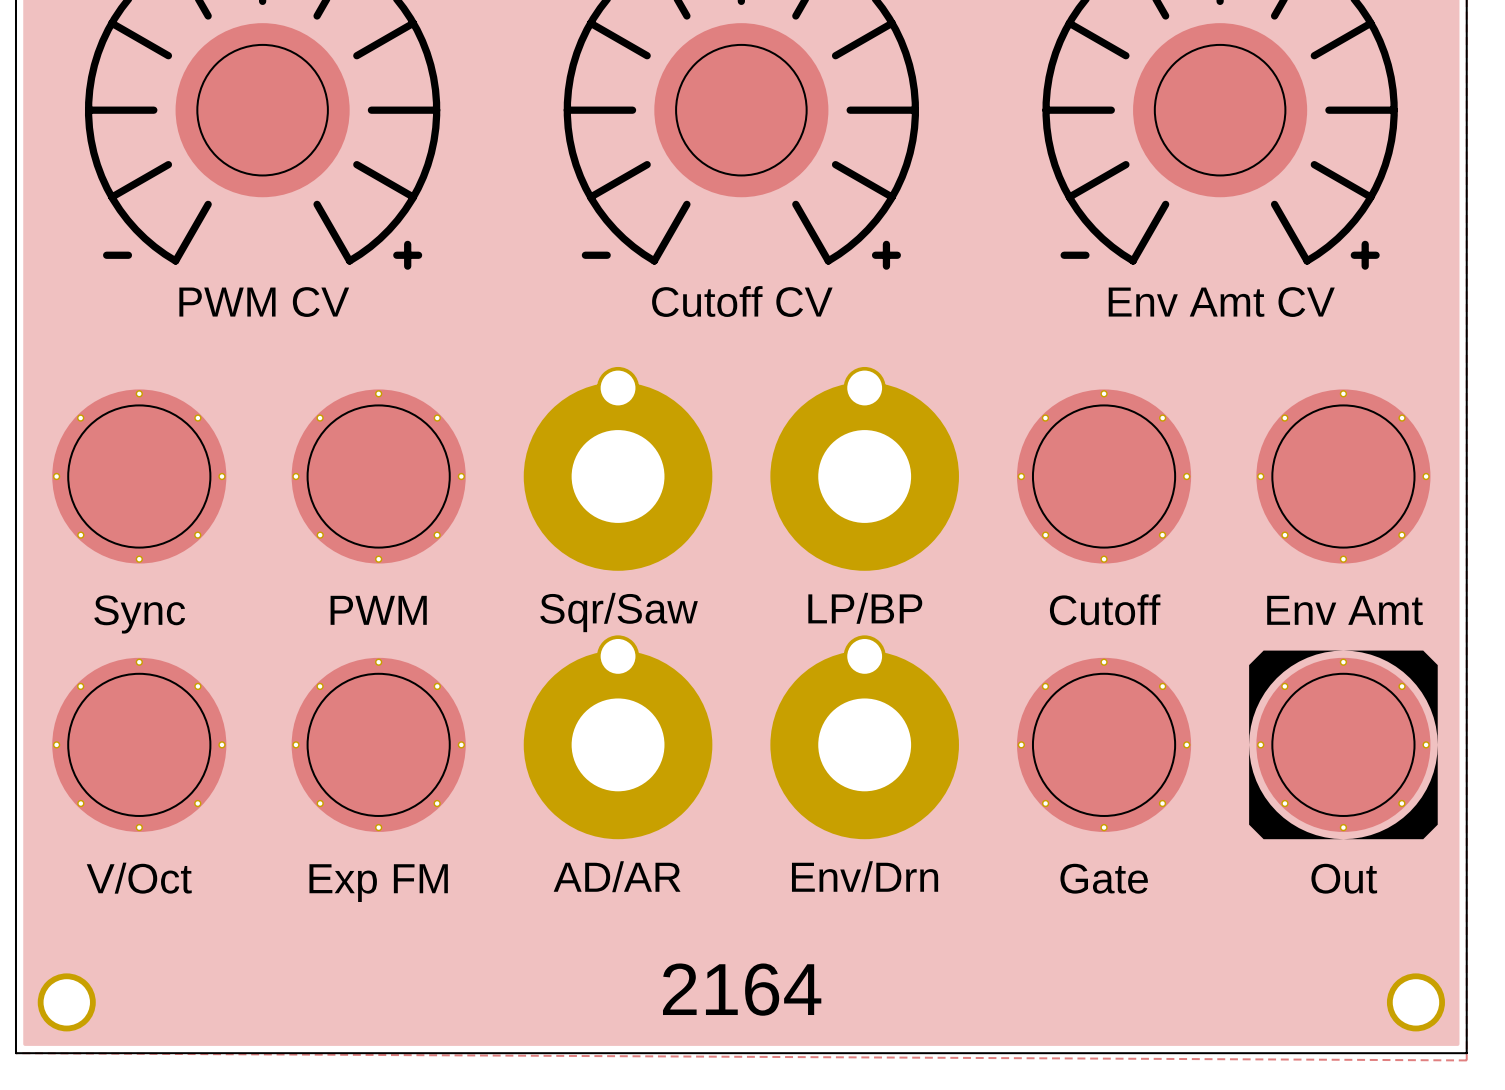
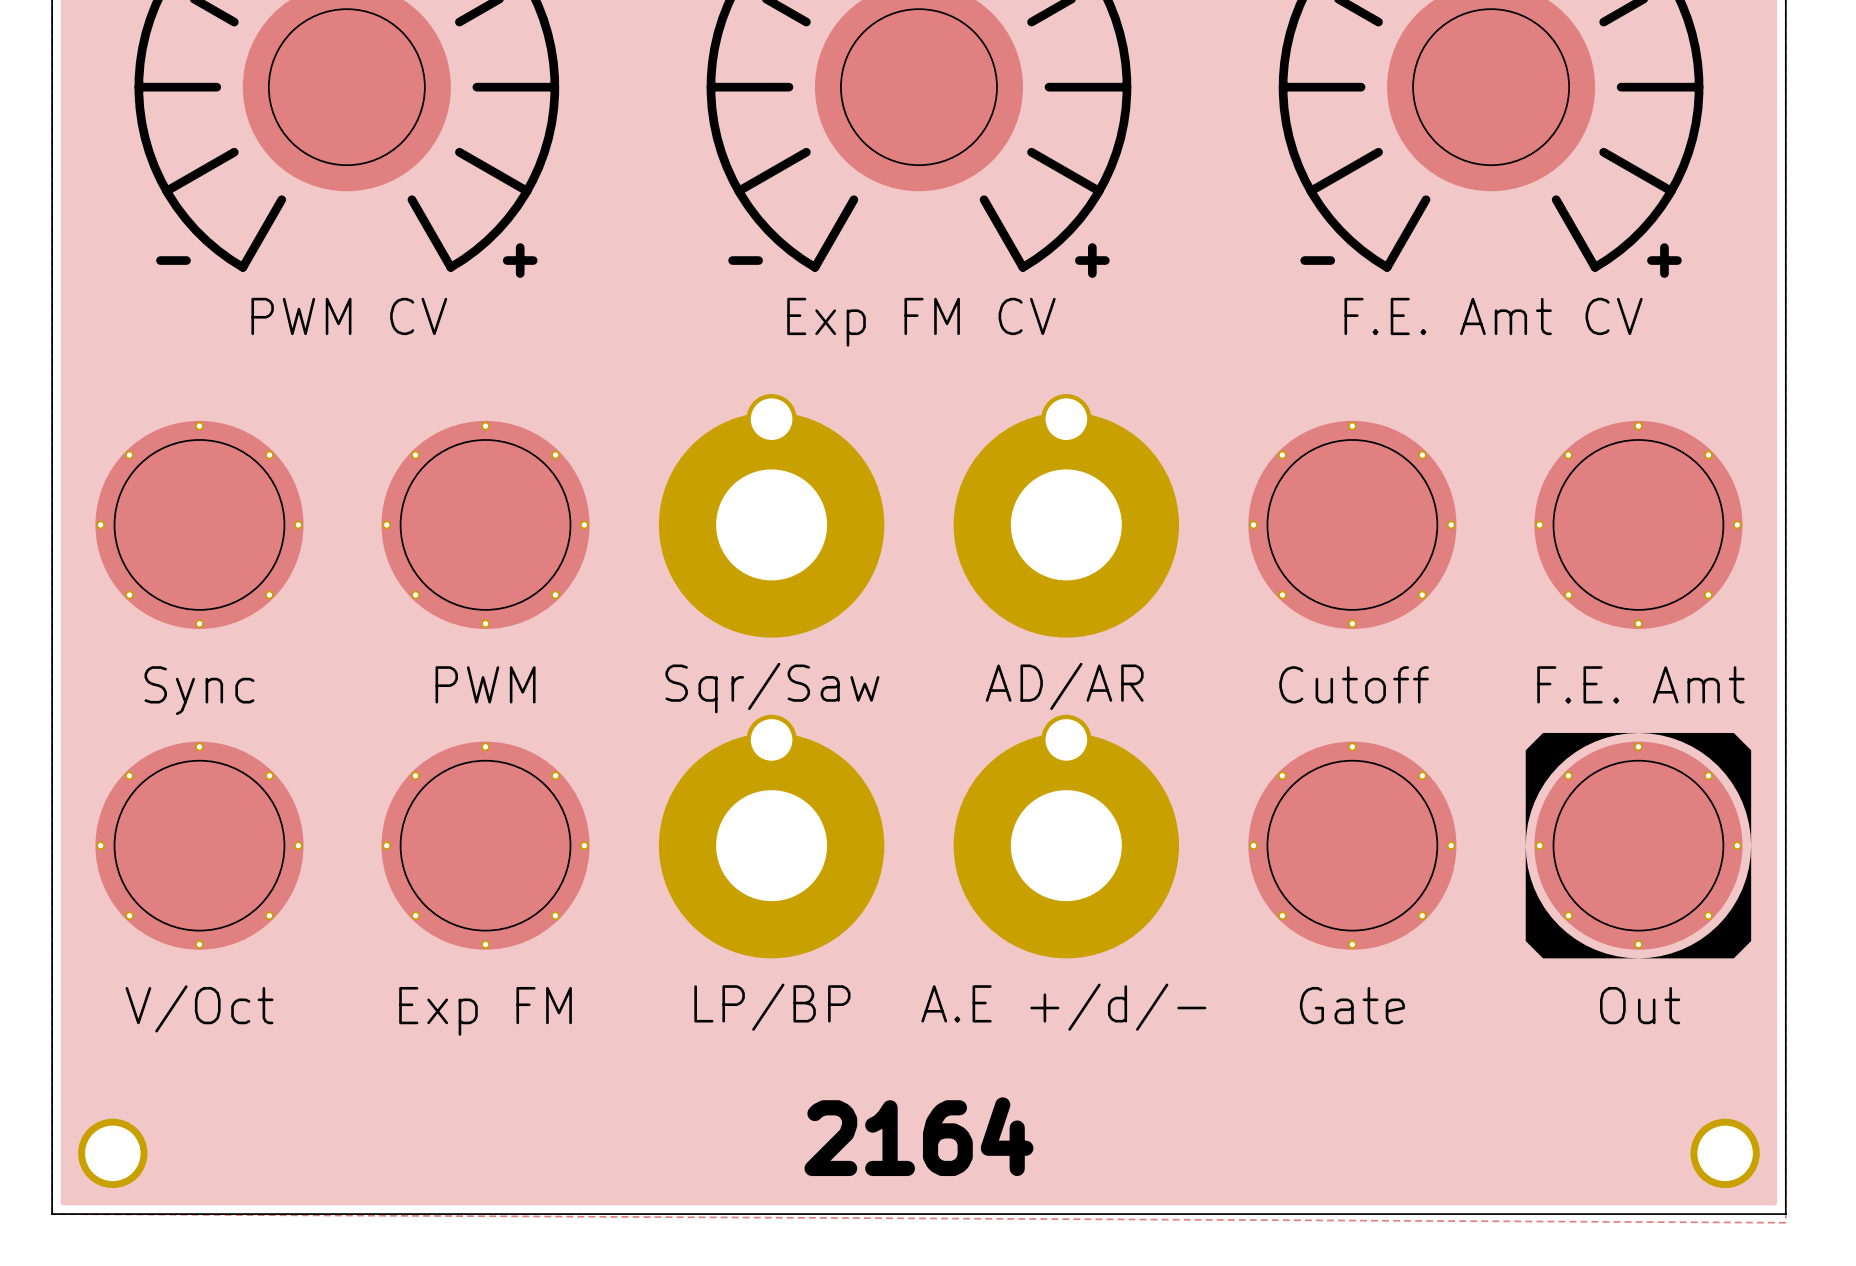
part value: Cutoff CV (742, 301) -> Exp FM CV (921, 322)
part value: Env Amt CV (1221, 302) -> F.E. Amt CV (1493, 316)
part value: LP/BP (865, 608) -> AD/AR (1064, 686)
part value: Env Amt (1345, 610) -> F.E. Amt (1640, 684)
part value: AD/AR (617, 876) -> LP/BP (772, 1007)
part value: Env/Drn (865, 876) -> A.E +/d/- (1063, 1007)

